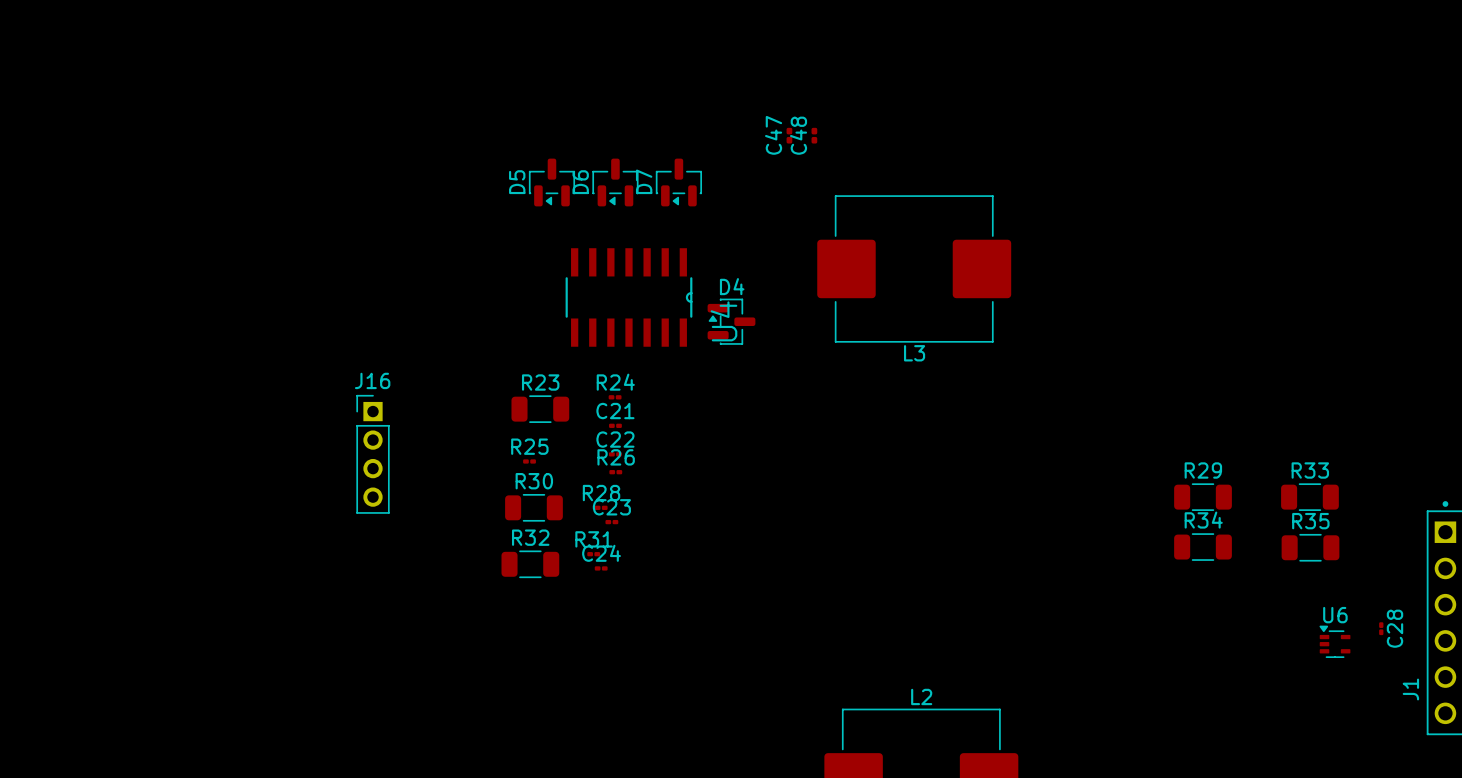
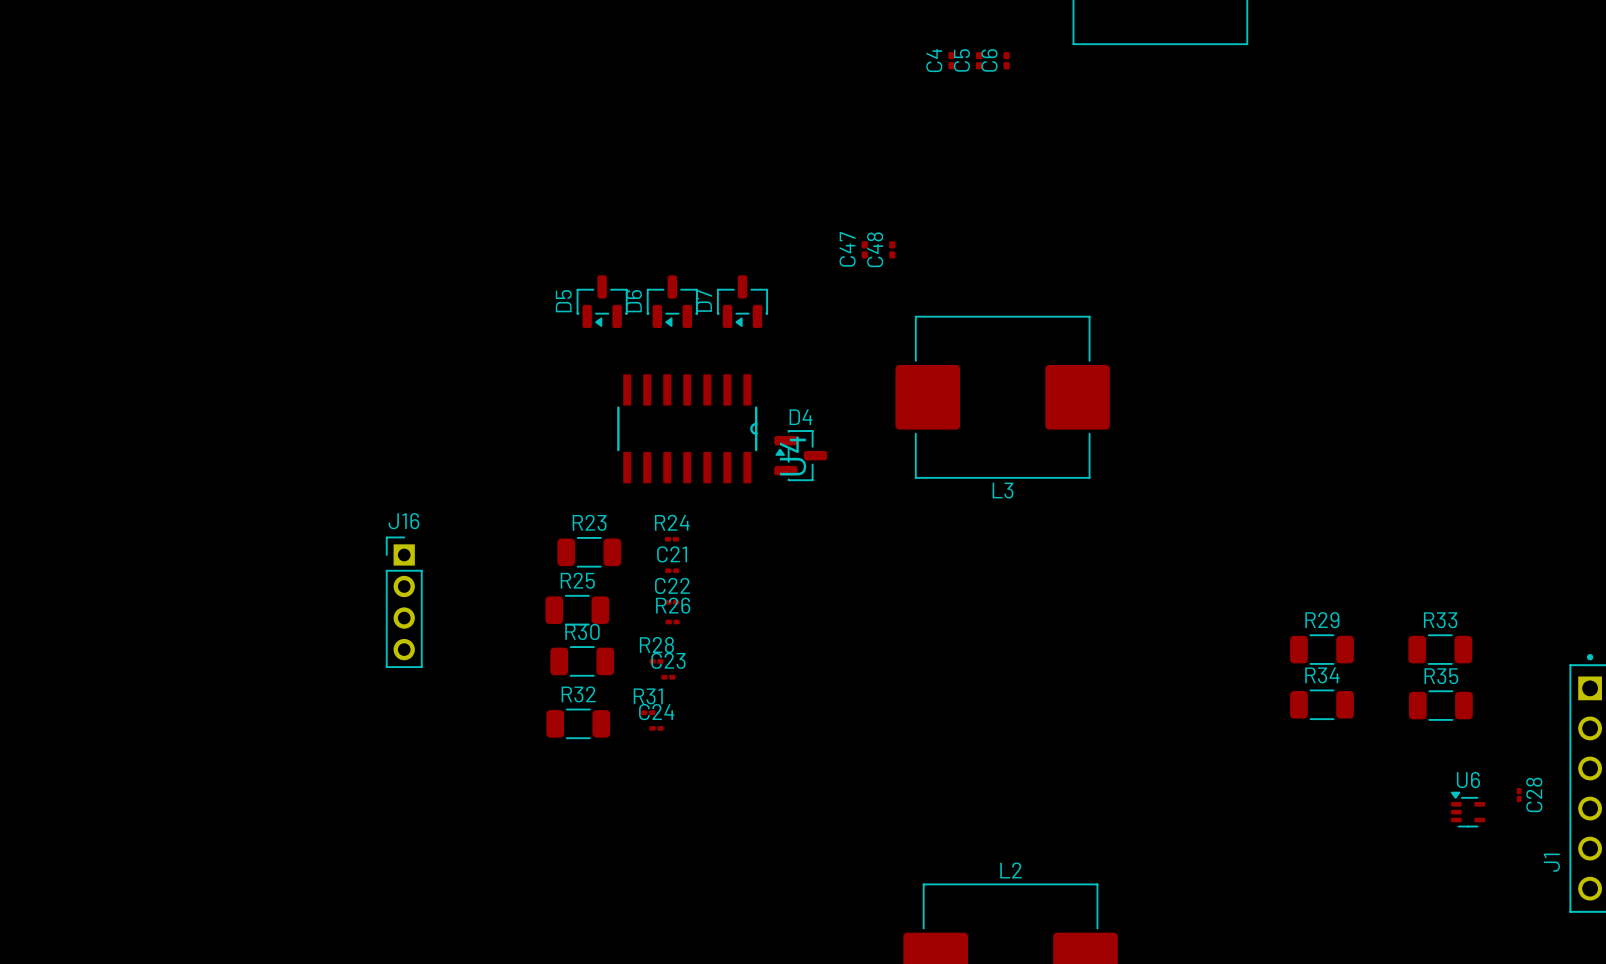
R25 footprint: [523, 459, 536, 464] -> [545, 594, 610, 626]

